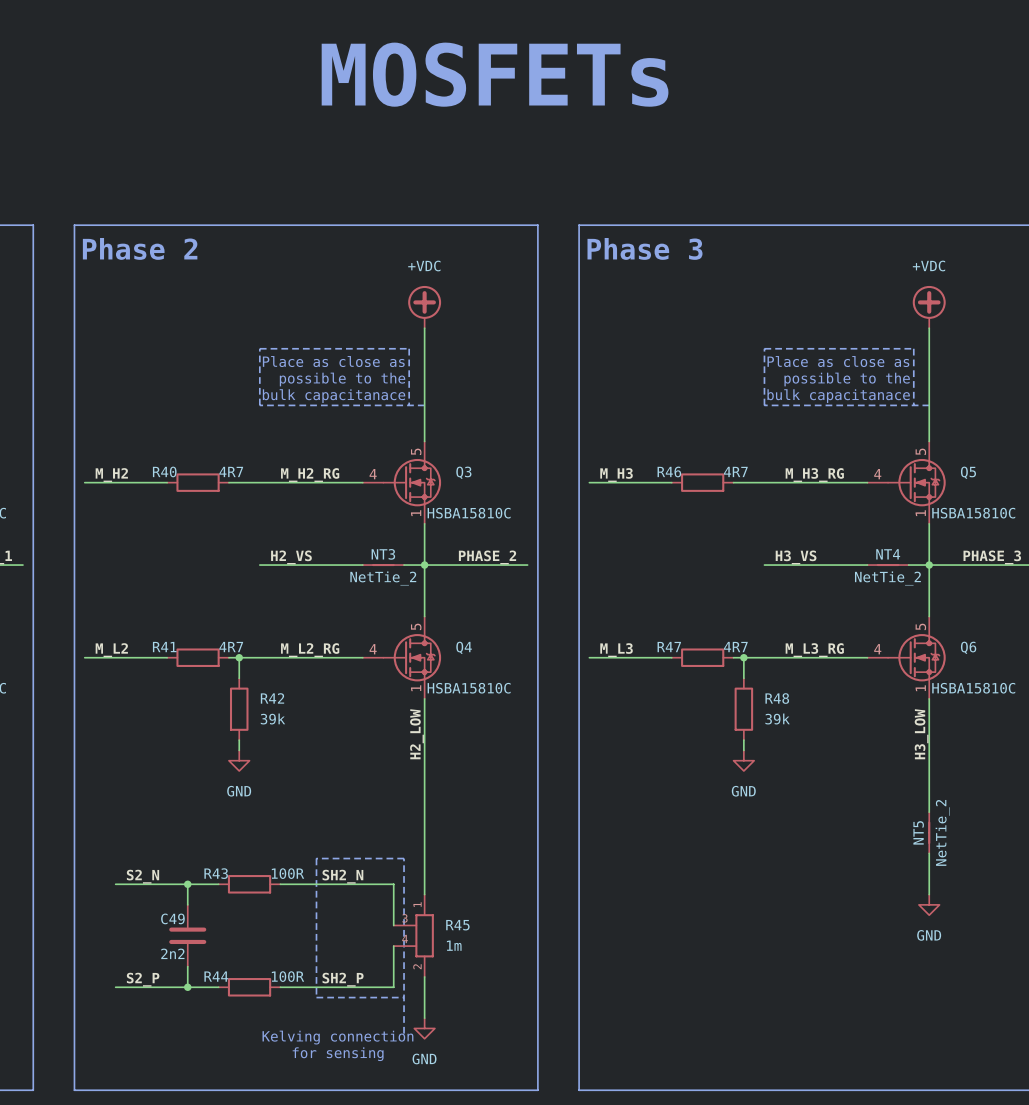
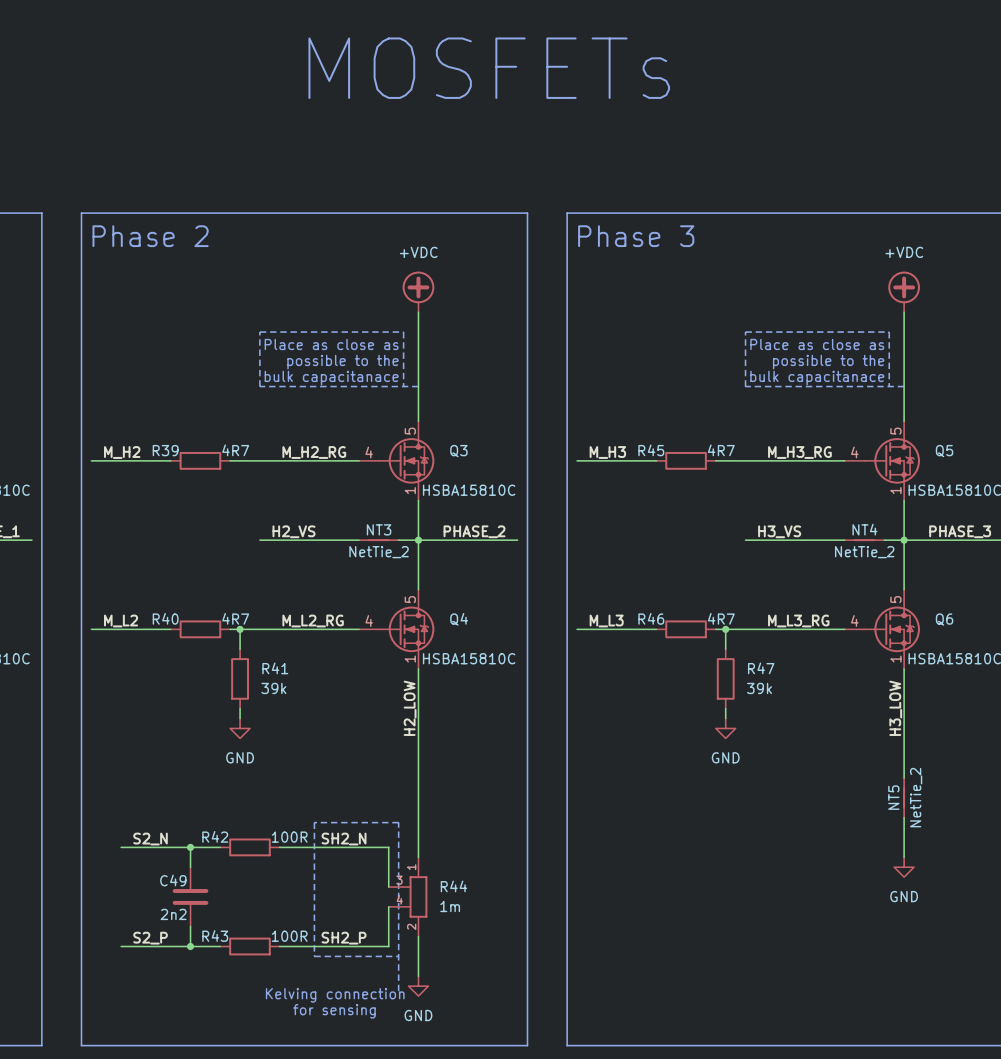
R40 name: R40 (164, 471) -> R39 (165, 450)
R46 name: R46 (669, 471) -> R45 (651, 450)
R41 name: R41 (164, 647) -> R40 (165, 618)
R47 name: R47 (669, 647) -> R46 (651, 618)
R42 name: R42 (272, 698) -> R41 (275, 668)
R48 name: R48 (777, 698) -> R47 (761, 668)
R43 name: R43 (216, 873) -> R42 (215, 836)
R45 name: R45 (457, 925) -> R44 (453, 886)
R44 name: R44 (216, 976) -> R43 (215, 935)

